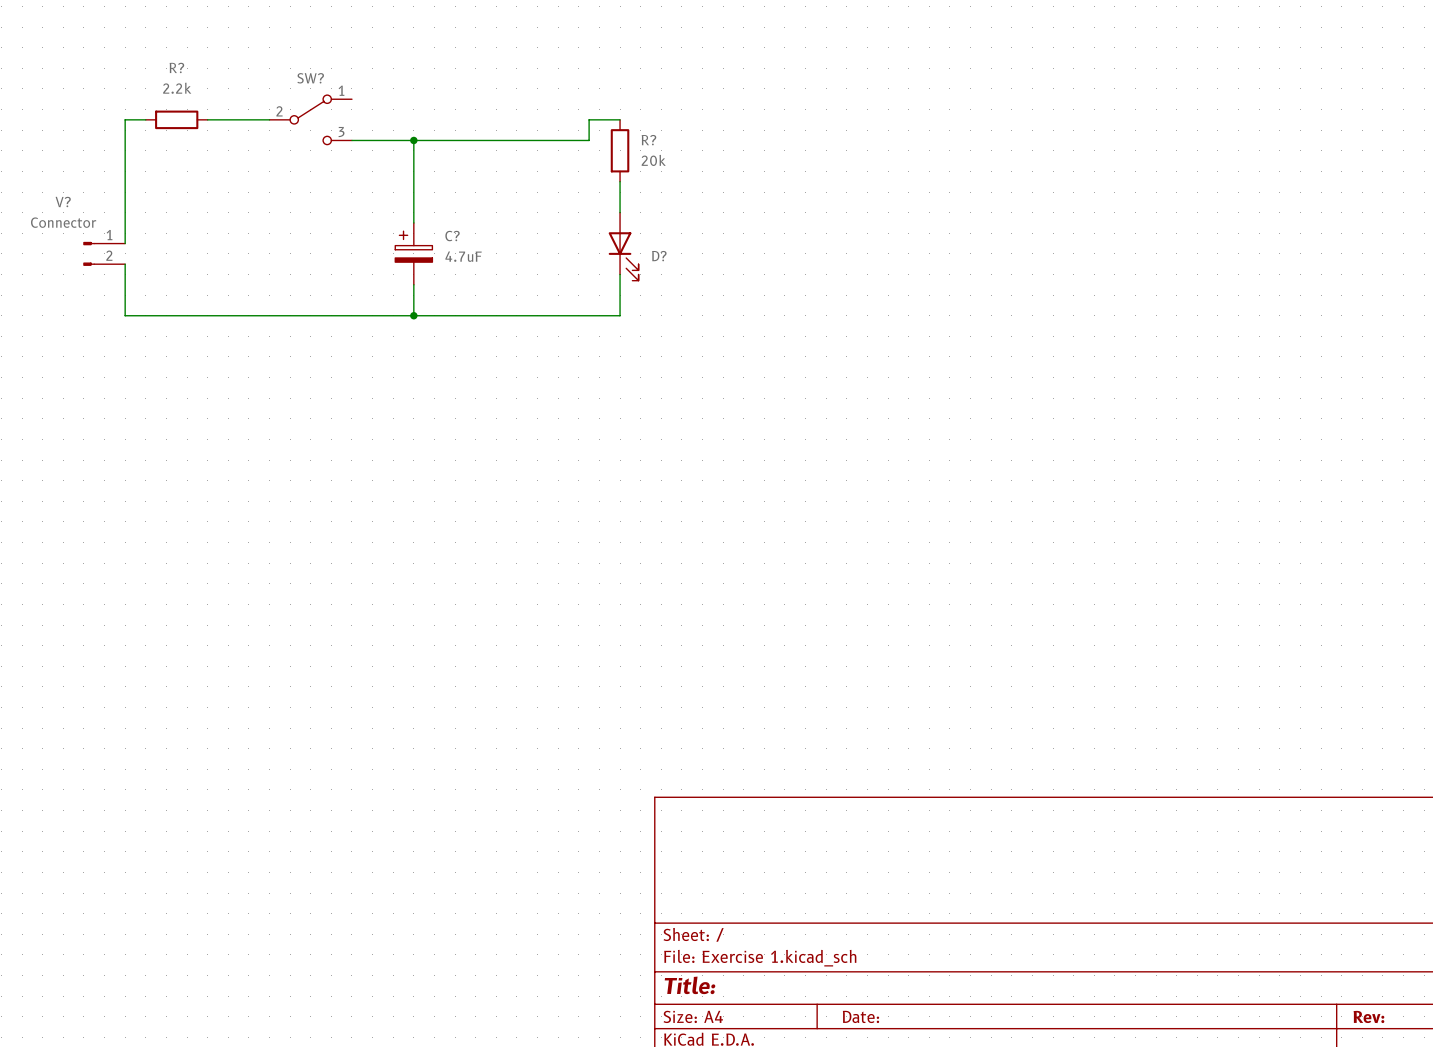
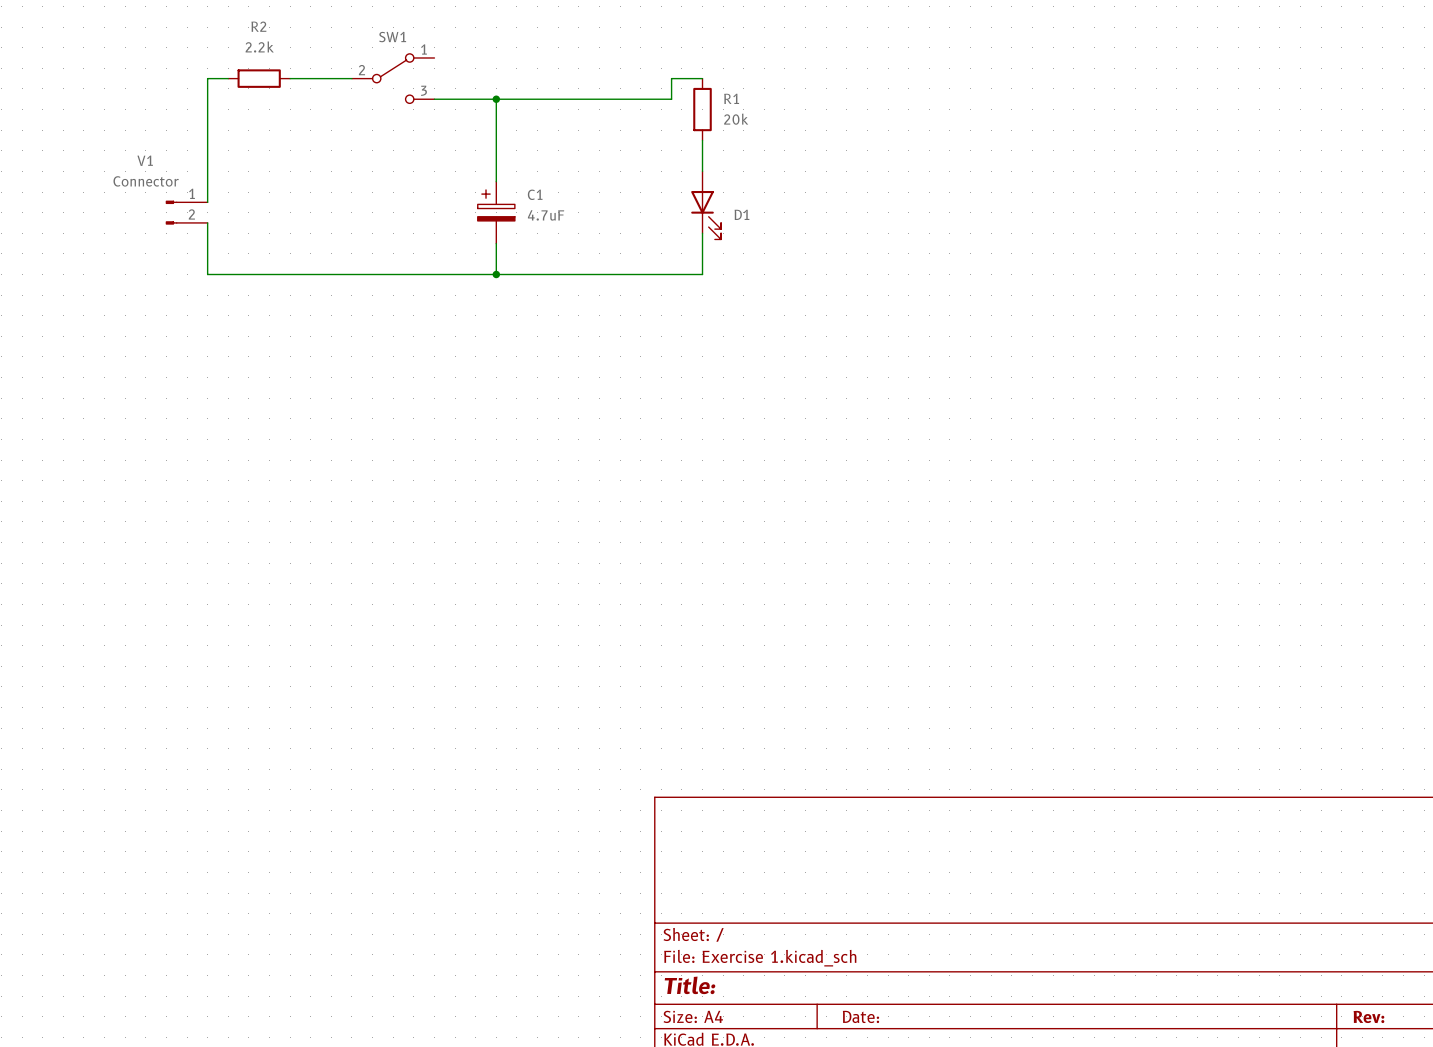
R2: none -> 2.2k (259, 78)
SW1: none -> (393, 78)
junction: none -> (496, 99)
R1: none -> 20k (702, 109)
wire: (145, 119) (125, 119) (125, 243) -> (228, 78) (207, 78) (207, 202)
R?: 2.2k (176, 119) -> none
wire: (207, 119) (269, 119) -> (290, 78) (351, 78)
SW?: (310, 119) -> none
wire: (620, 119) (589, 119) (589, 140) (351, 140) -> (702, 78) (671, 78) (671, 99) (434, 99)
wire: (413, 140) (413, 222) -> (496, 99) (496, 181)
junction: (413, 140) -> none
R?: 20k (620, 150) -> none
wire: (620, 181) (620, 212) -> (702, 140) (702, 171)
D1: none -> (706, 205)
V1: none -> Connector (186, 212)
C1: none -> 4.7uF (496, 212)
D?: (623, 246) -> none
V?: Connector (104, 253) -> none
C?: 4.7uF (413, 253) -> none
wire: (125, 264) (125, 315) (620, 315) (620, 274) -> (207, 222) (207, 274) (702, 274) (702, 233)
junction: none -> (496, 274)
wire: (413, 284) (413, 315) -> (496, 243) (496, 274)
junction: (413, 315) -> none

